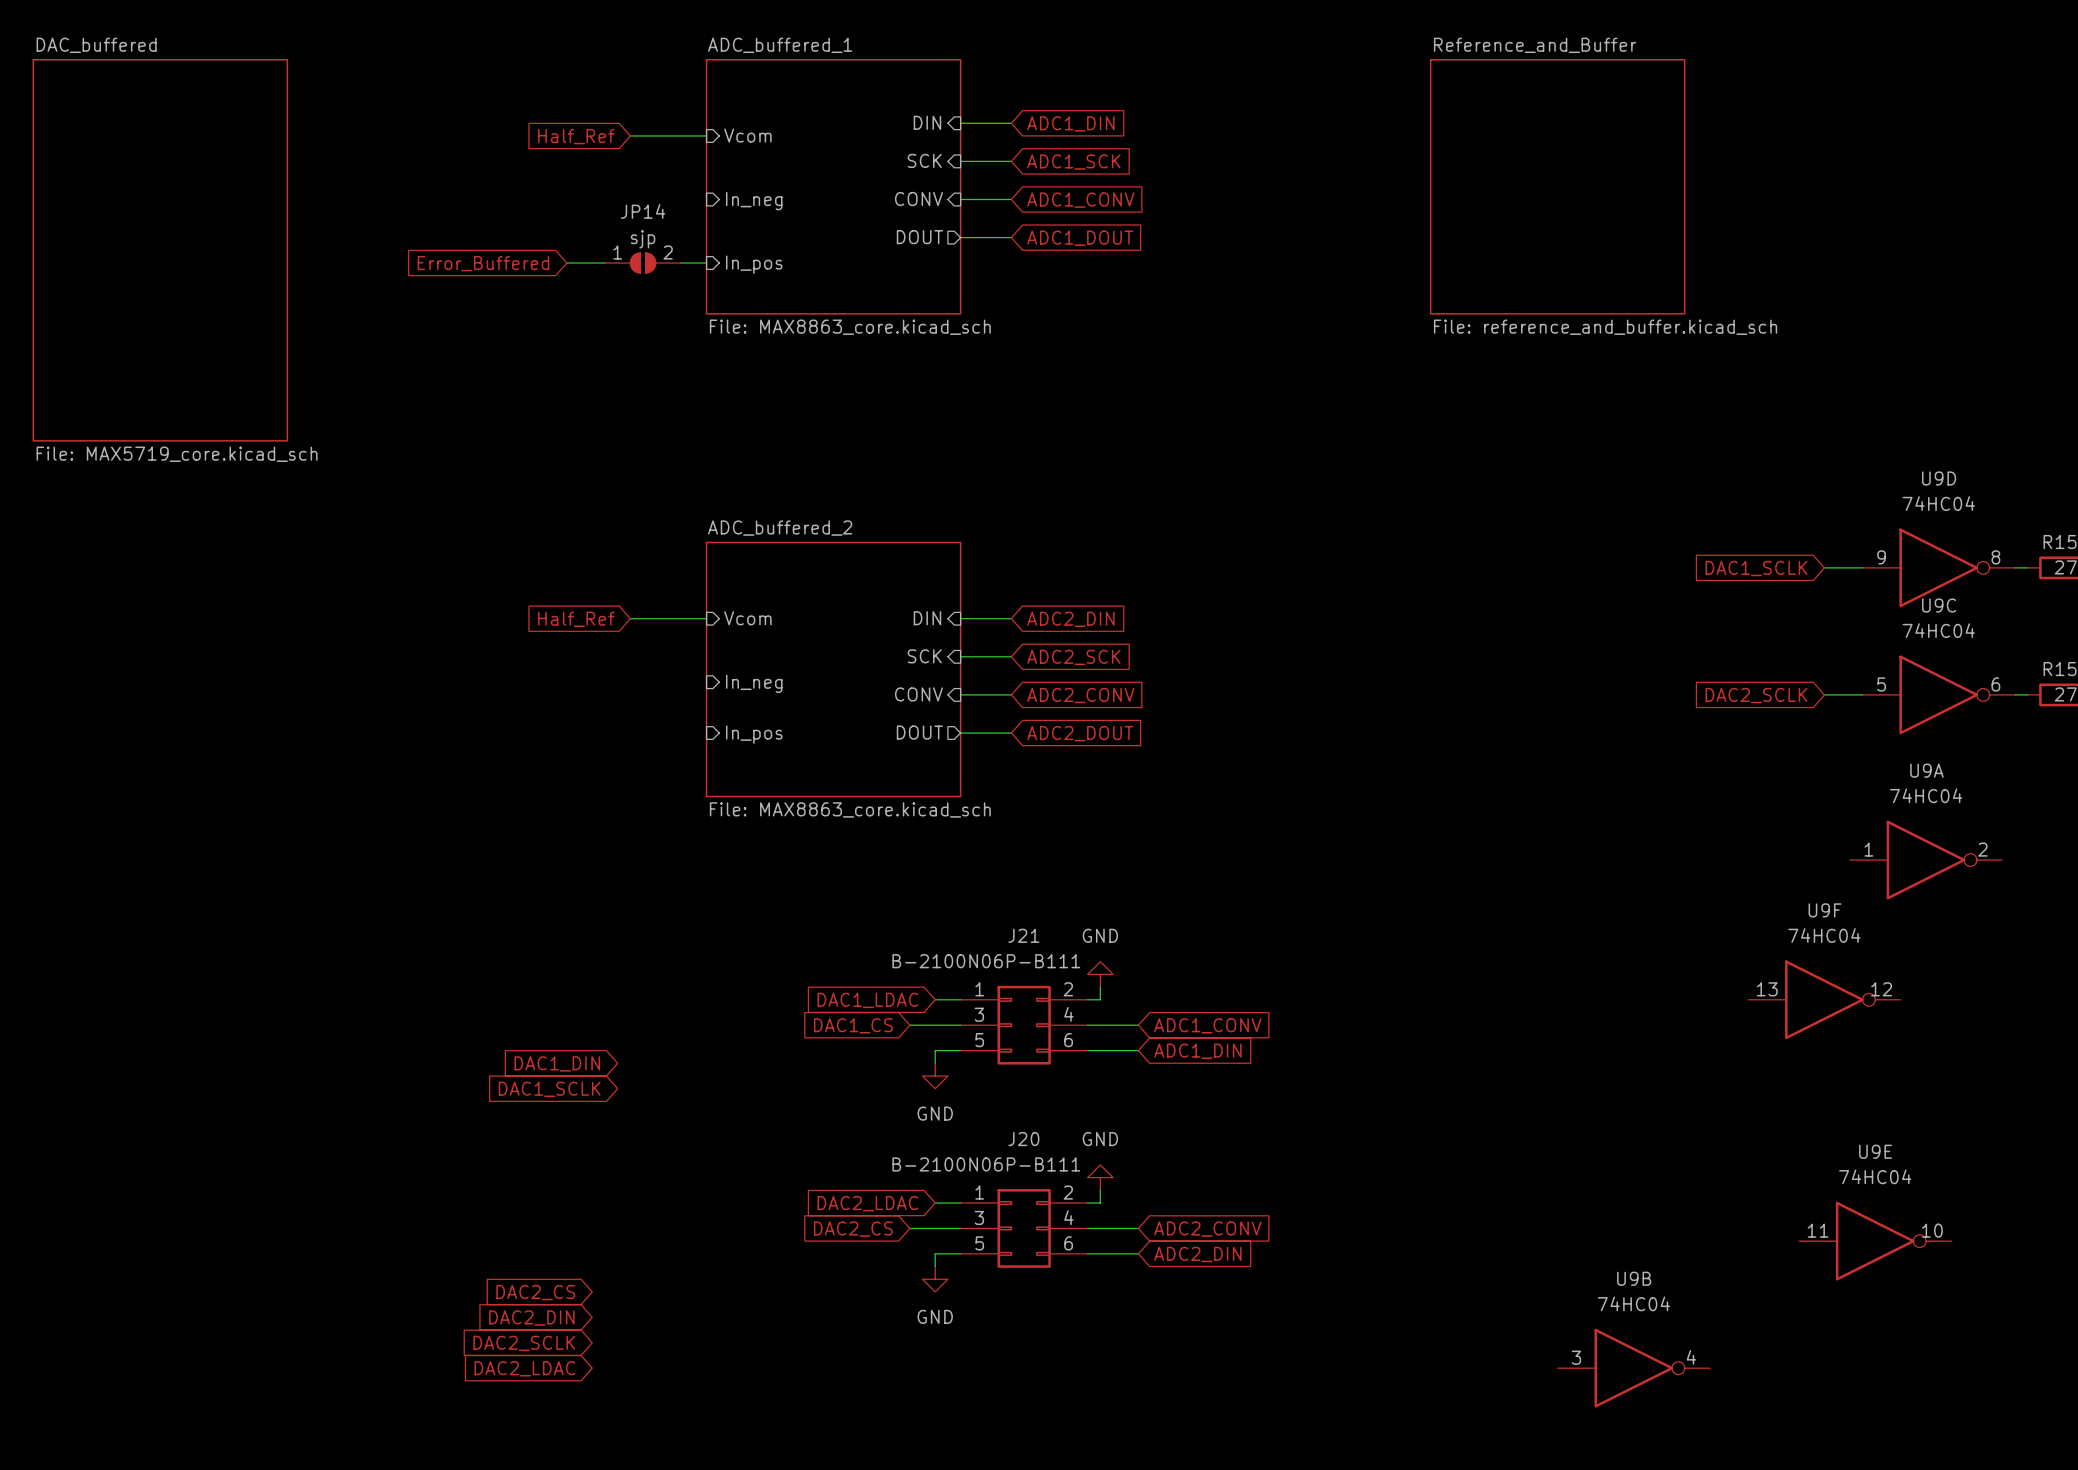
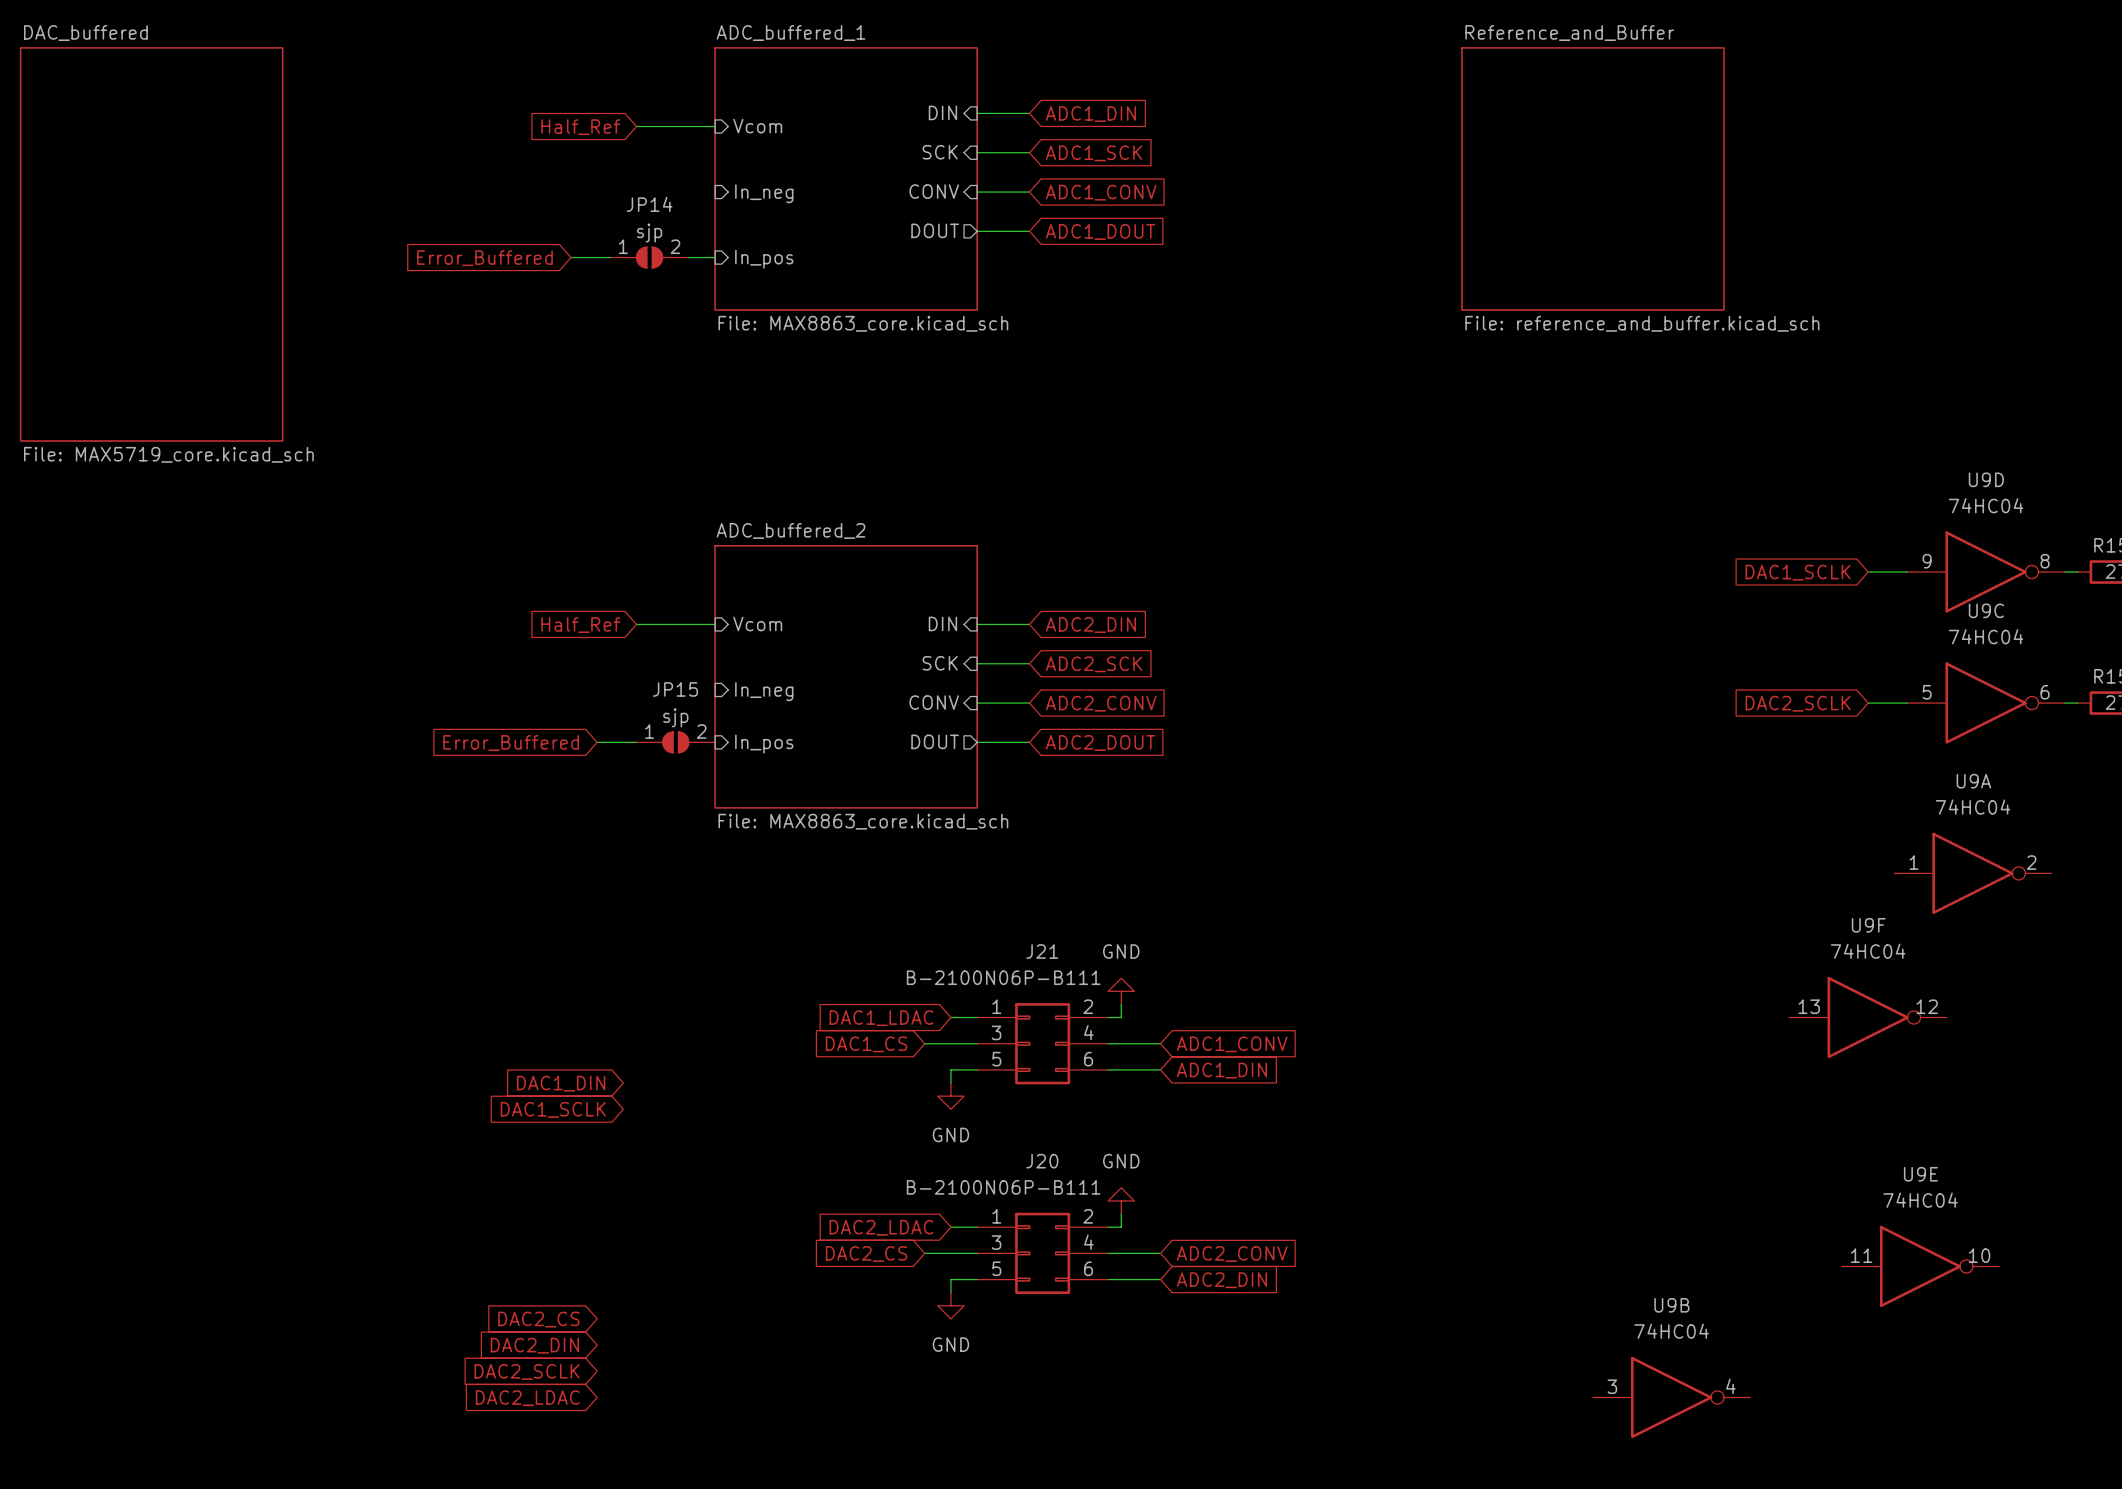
global label: none -> Error_Buffered (511, 742)
wire: none -> (597, 742) (636, 742)
JP15: none -> sjp (675, 742)

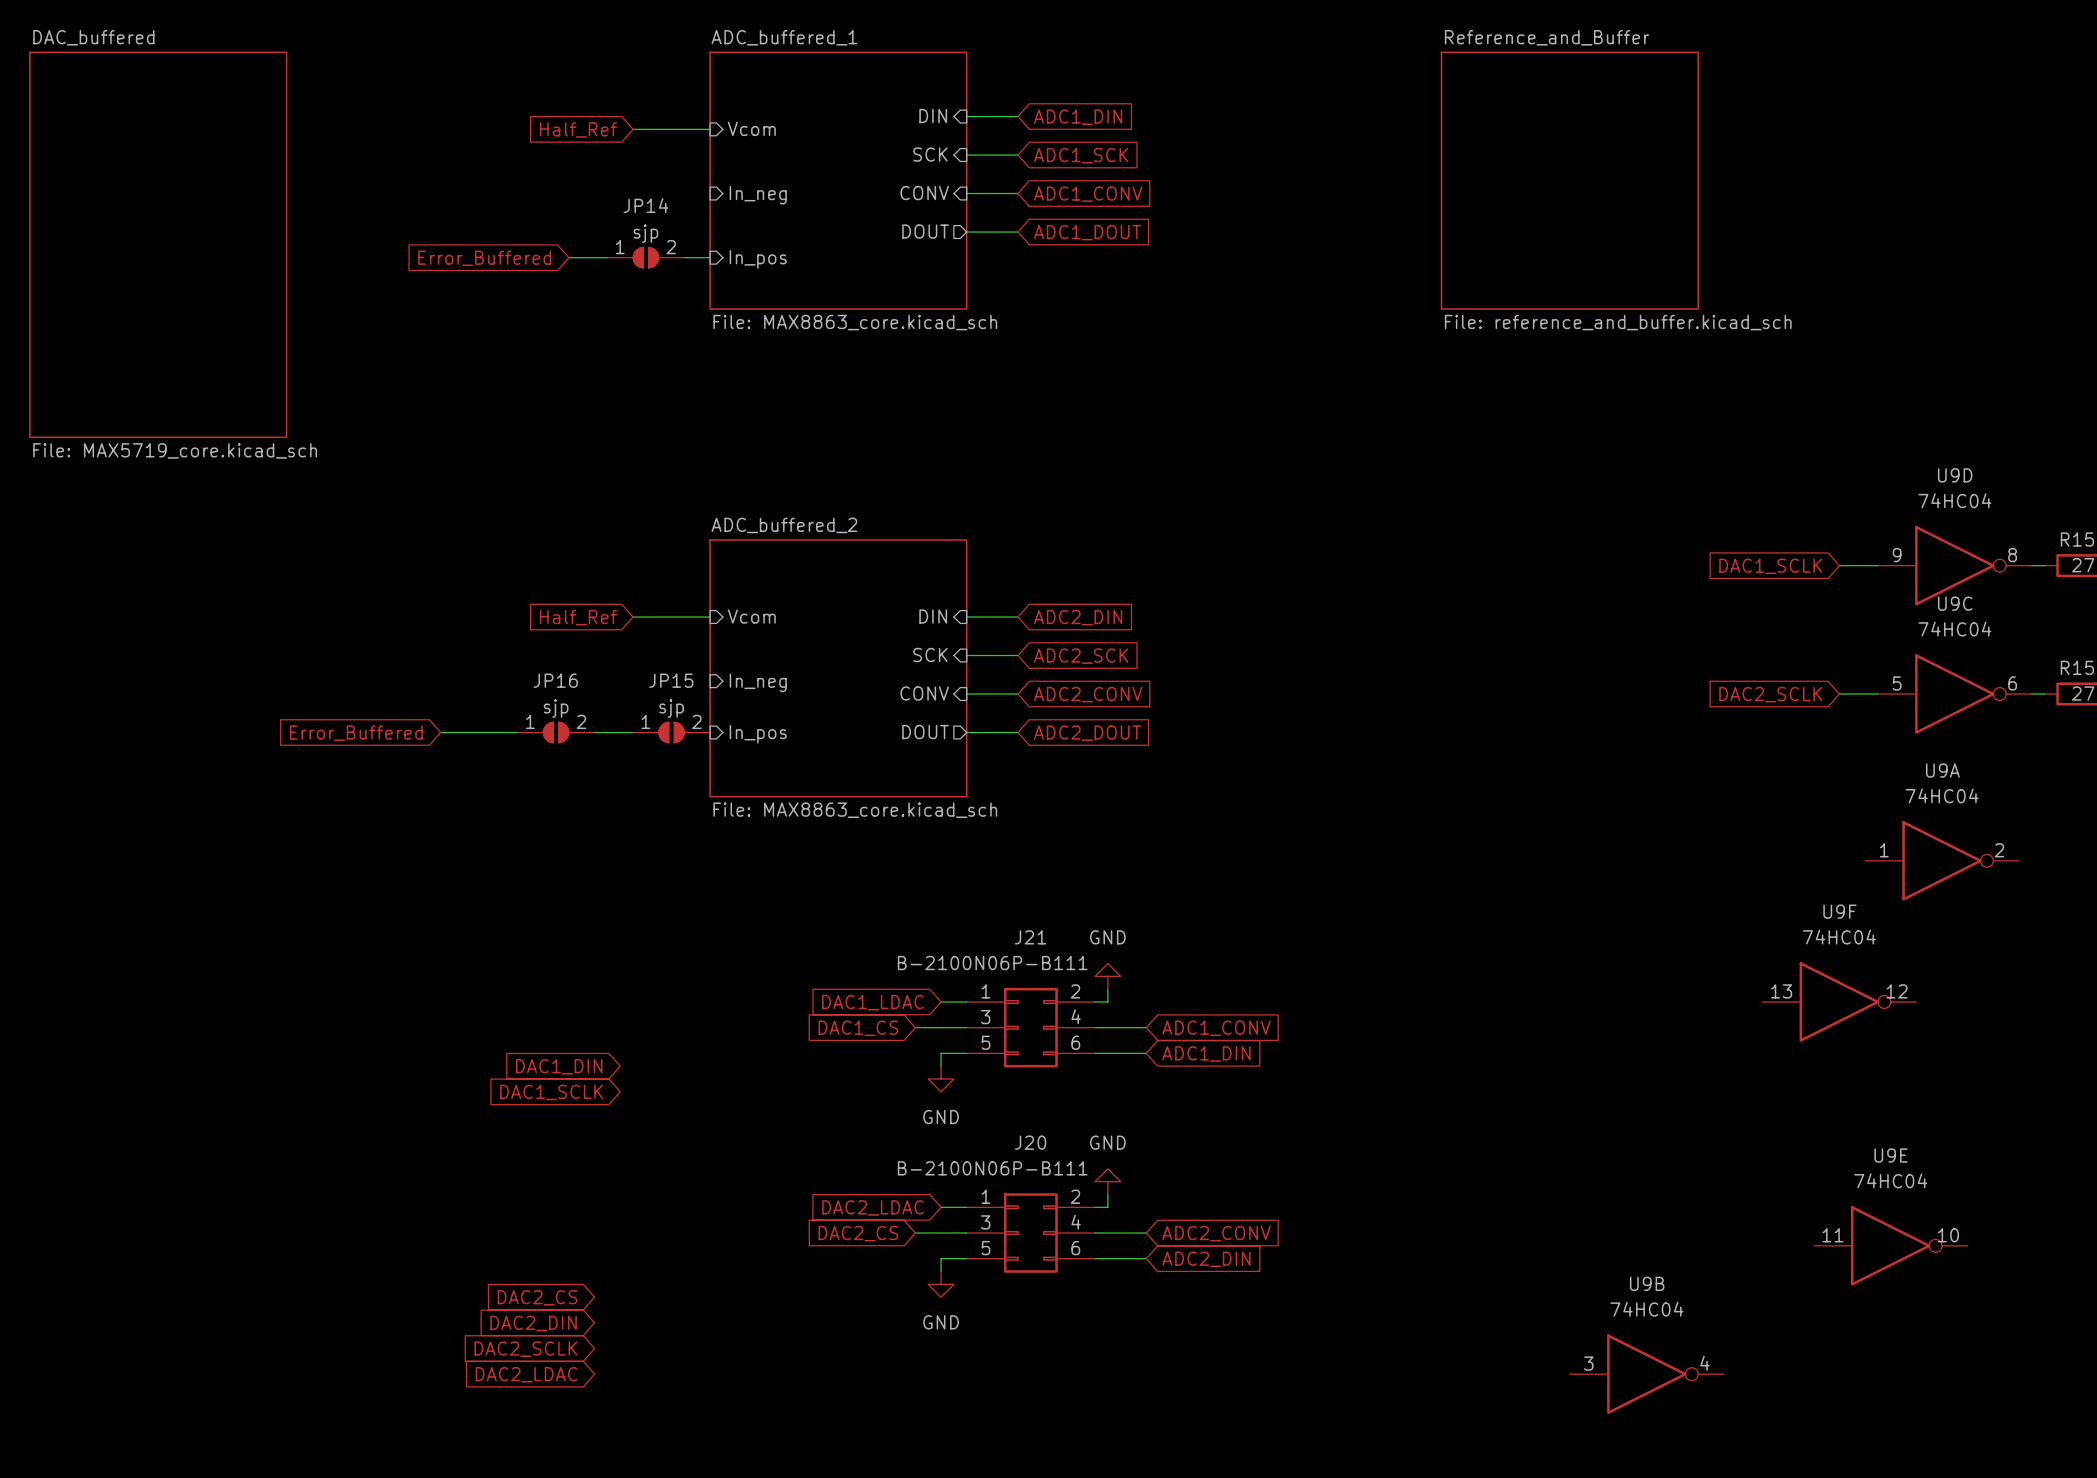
wire: none -> (440, 732) (517, 732)
global label position: Error_Buffered (511, 742) -> Error_Buffered (356, 733)
JP16: none -> sjp (556, 732)

